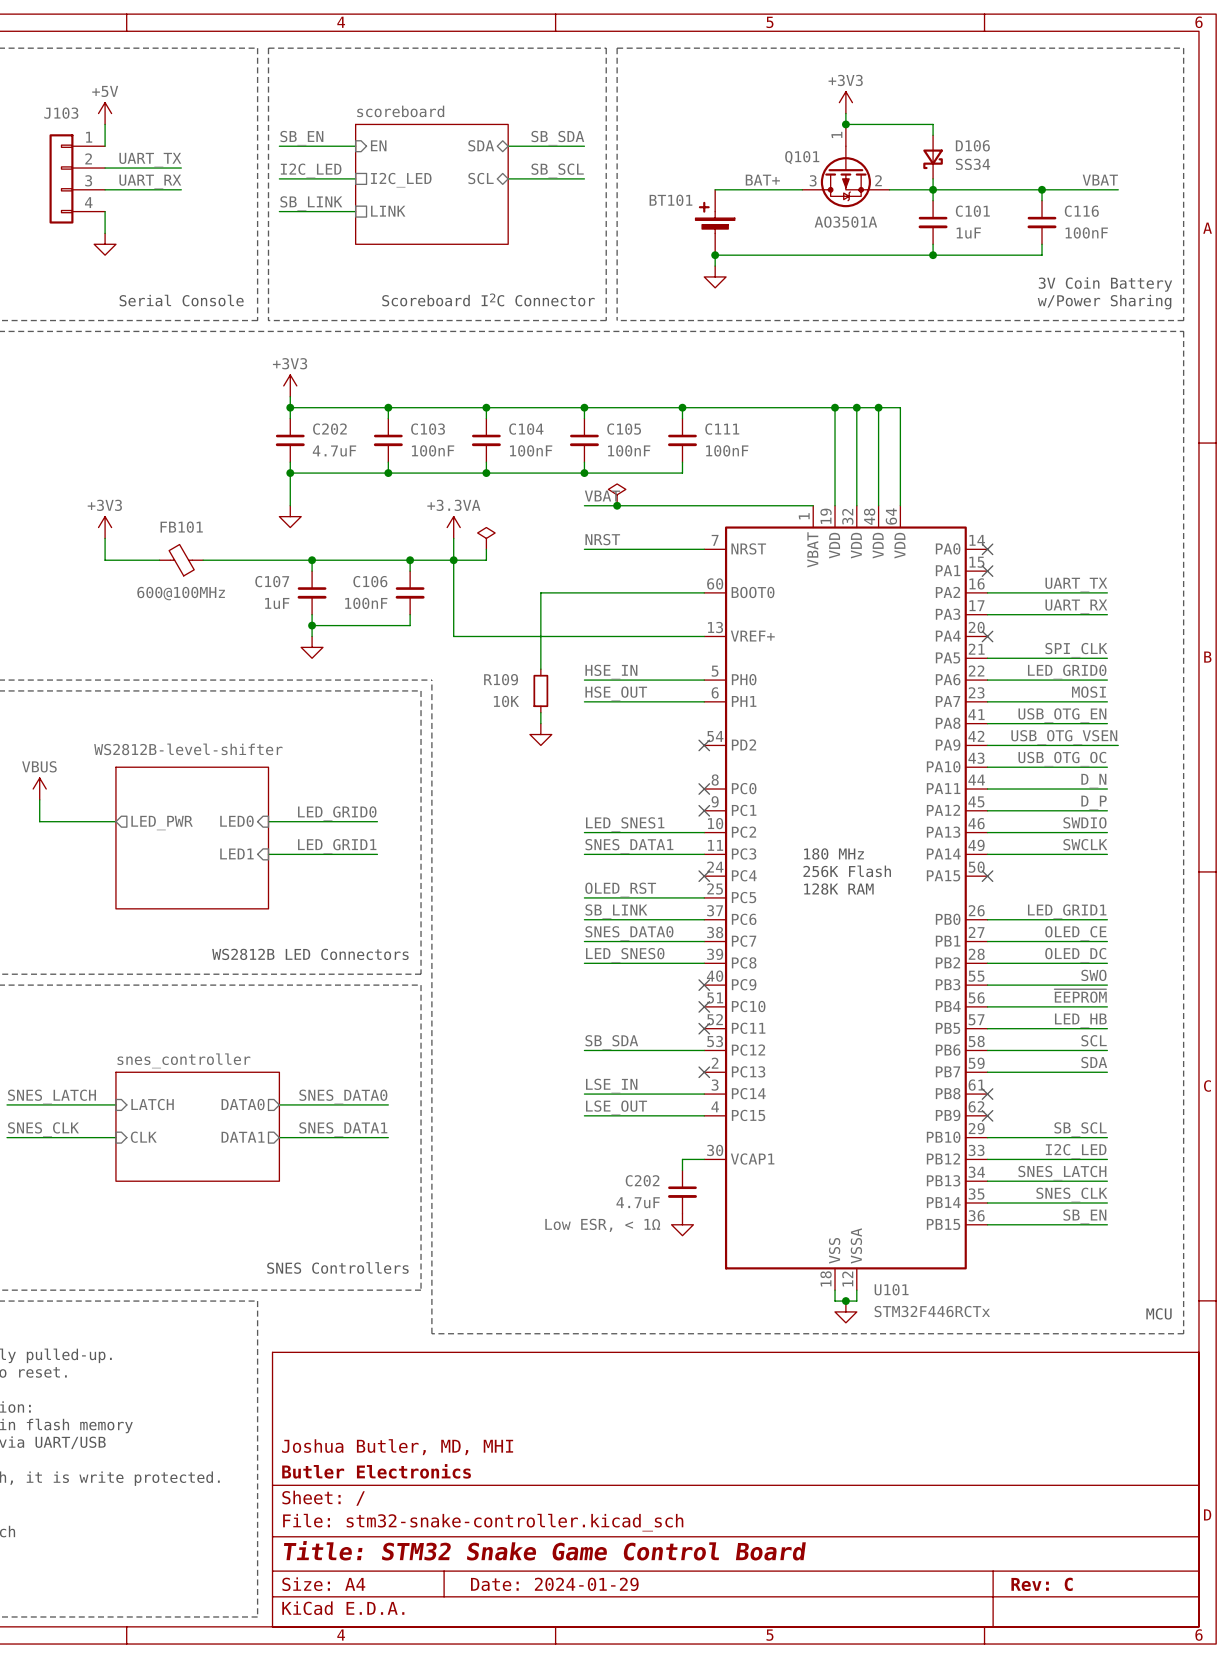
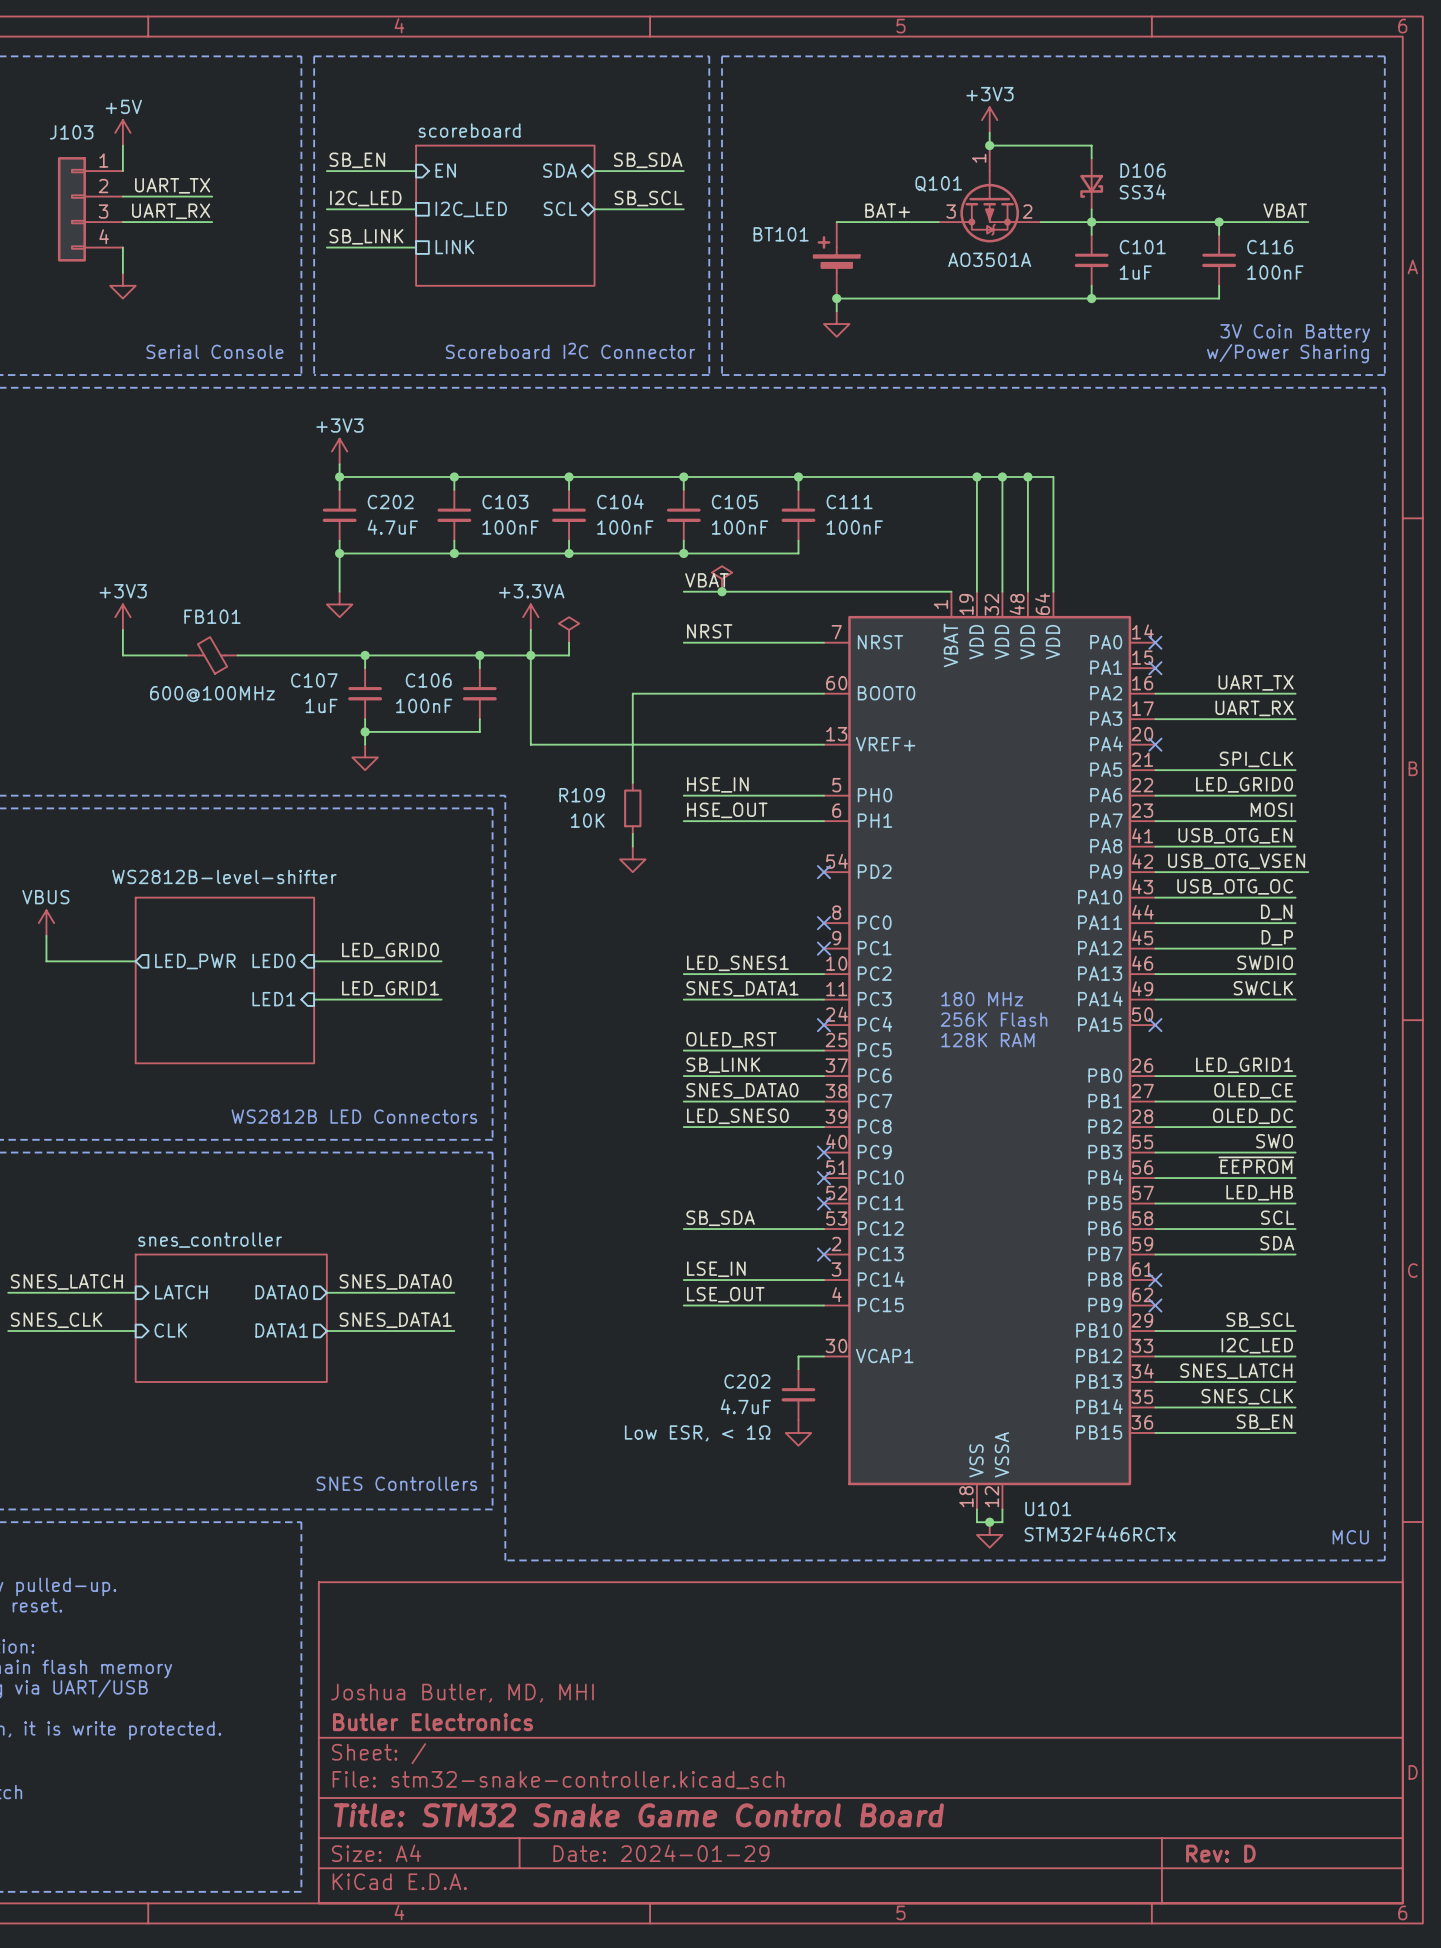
title block: Rev: C (1042, 1584) -> Rev: D (1220, 1853)

